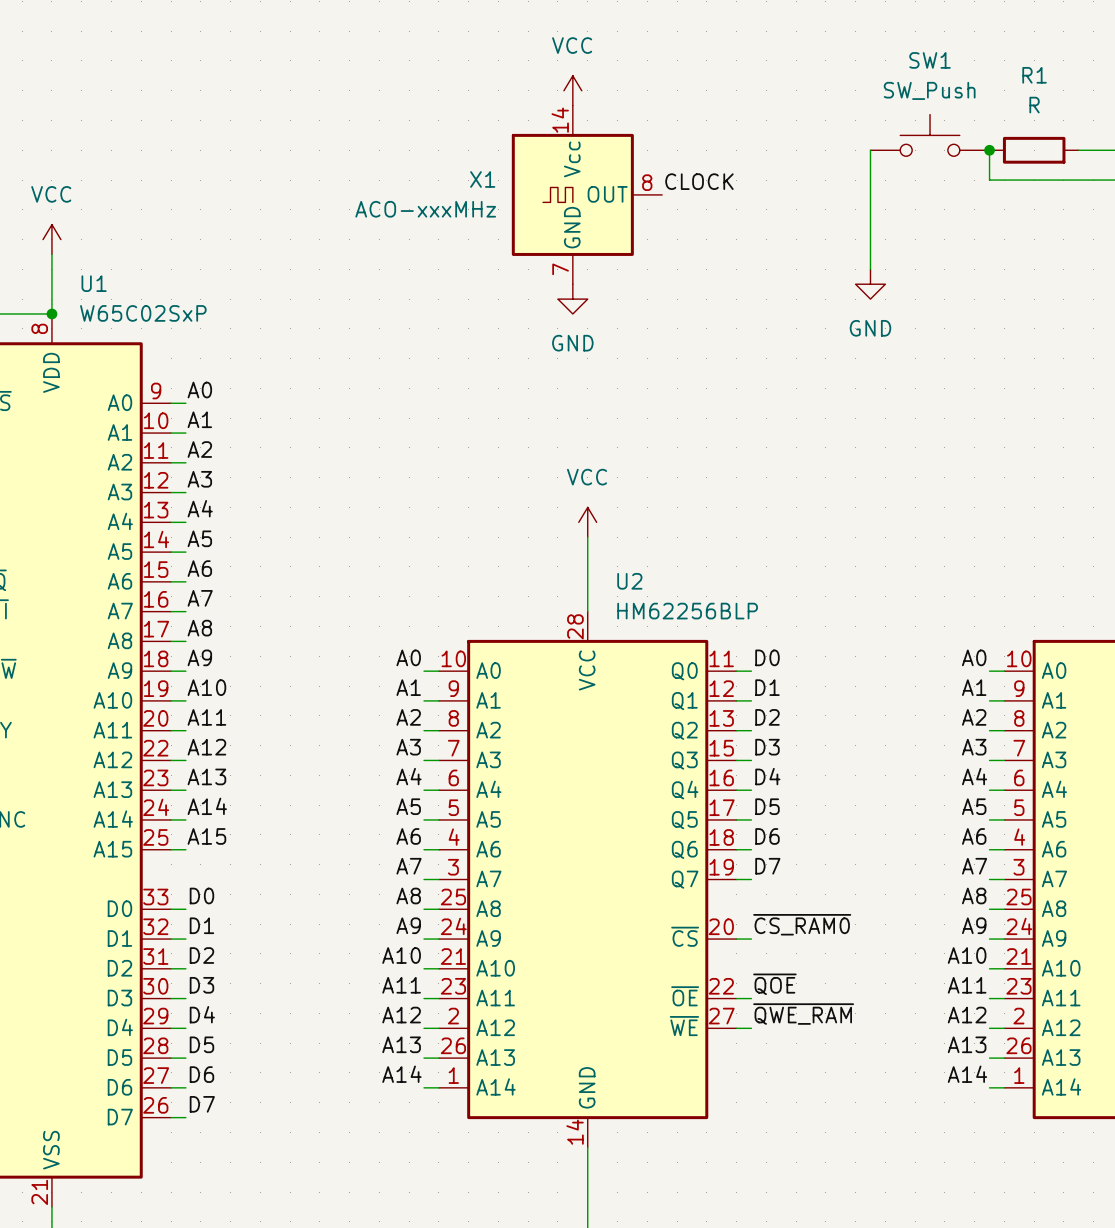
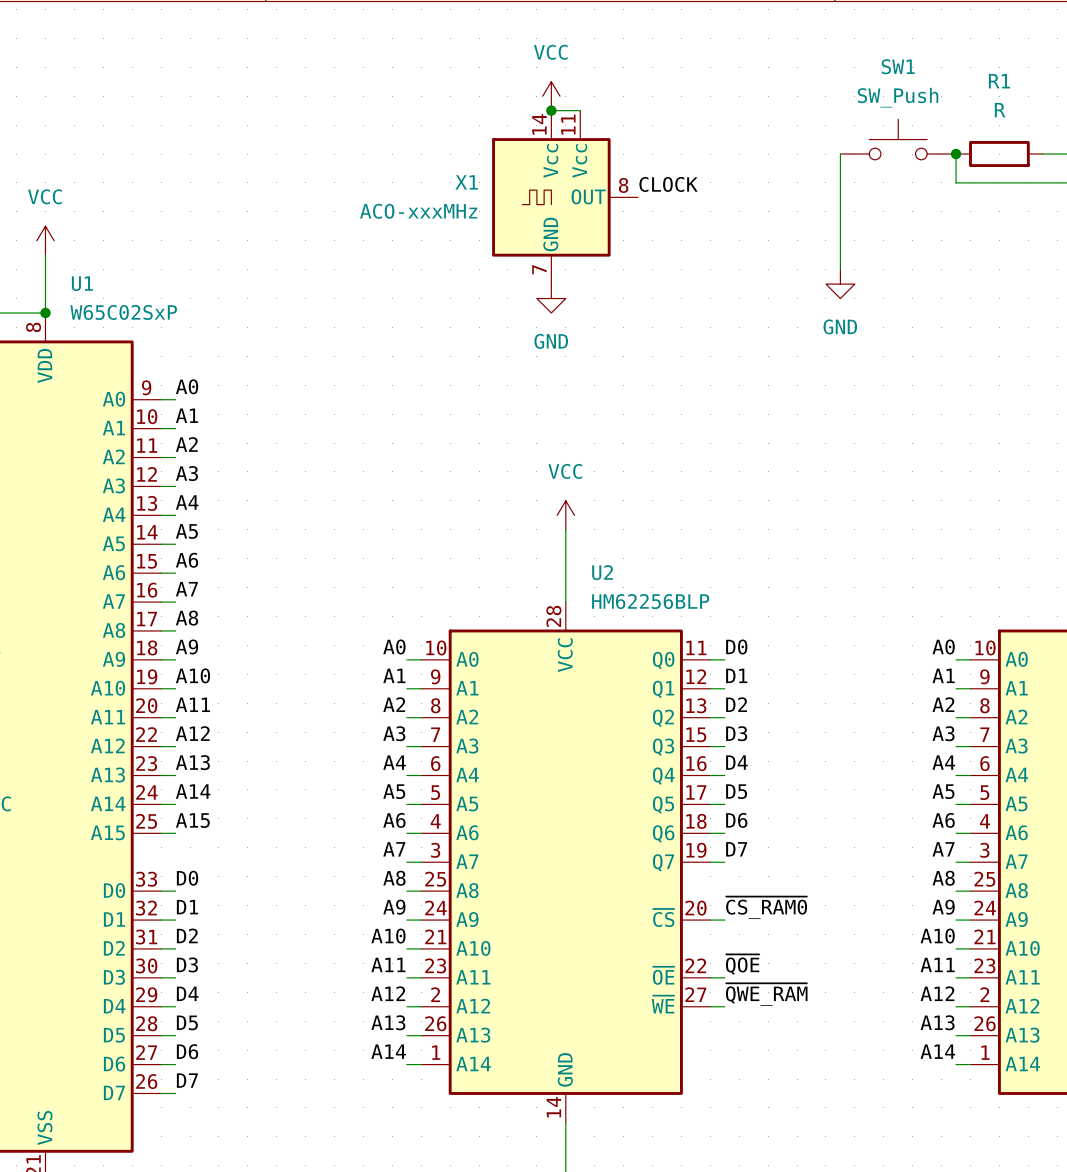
X1 symbol: [511, 105, 663, 285] -> [492, 110, 639, 285]
wire: none -> (551, 110) (580, 110)
junction: none -> (551, 110)

